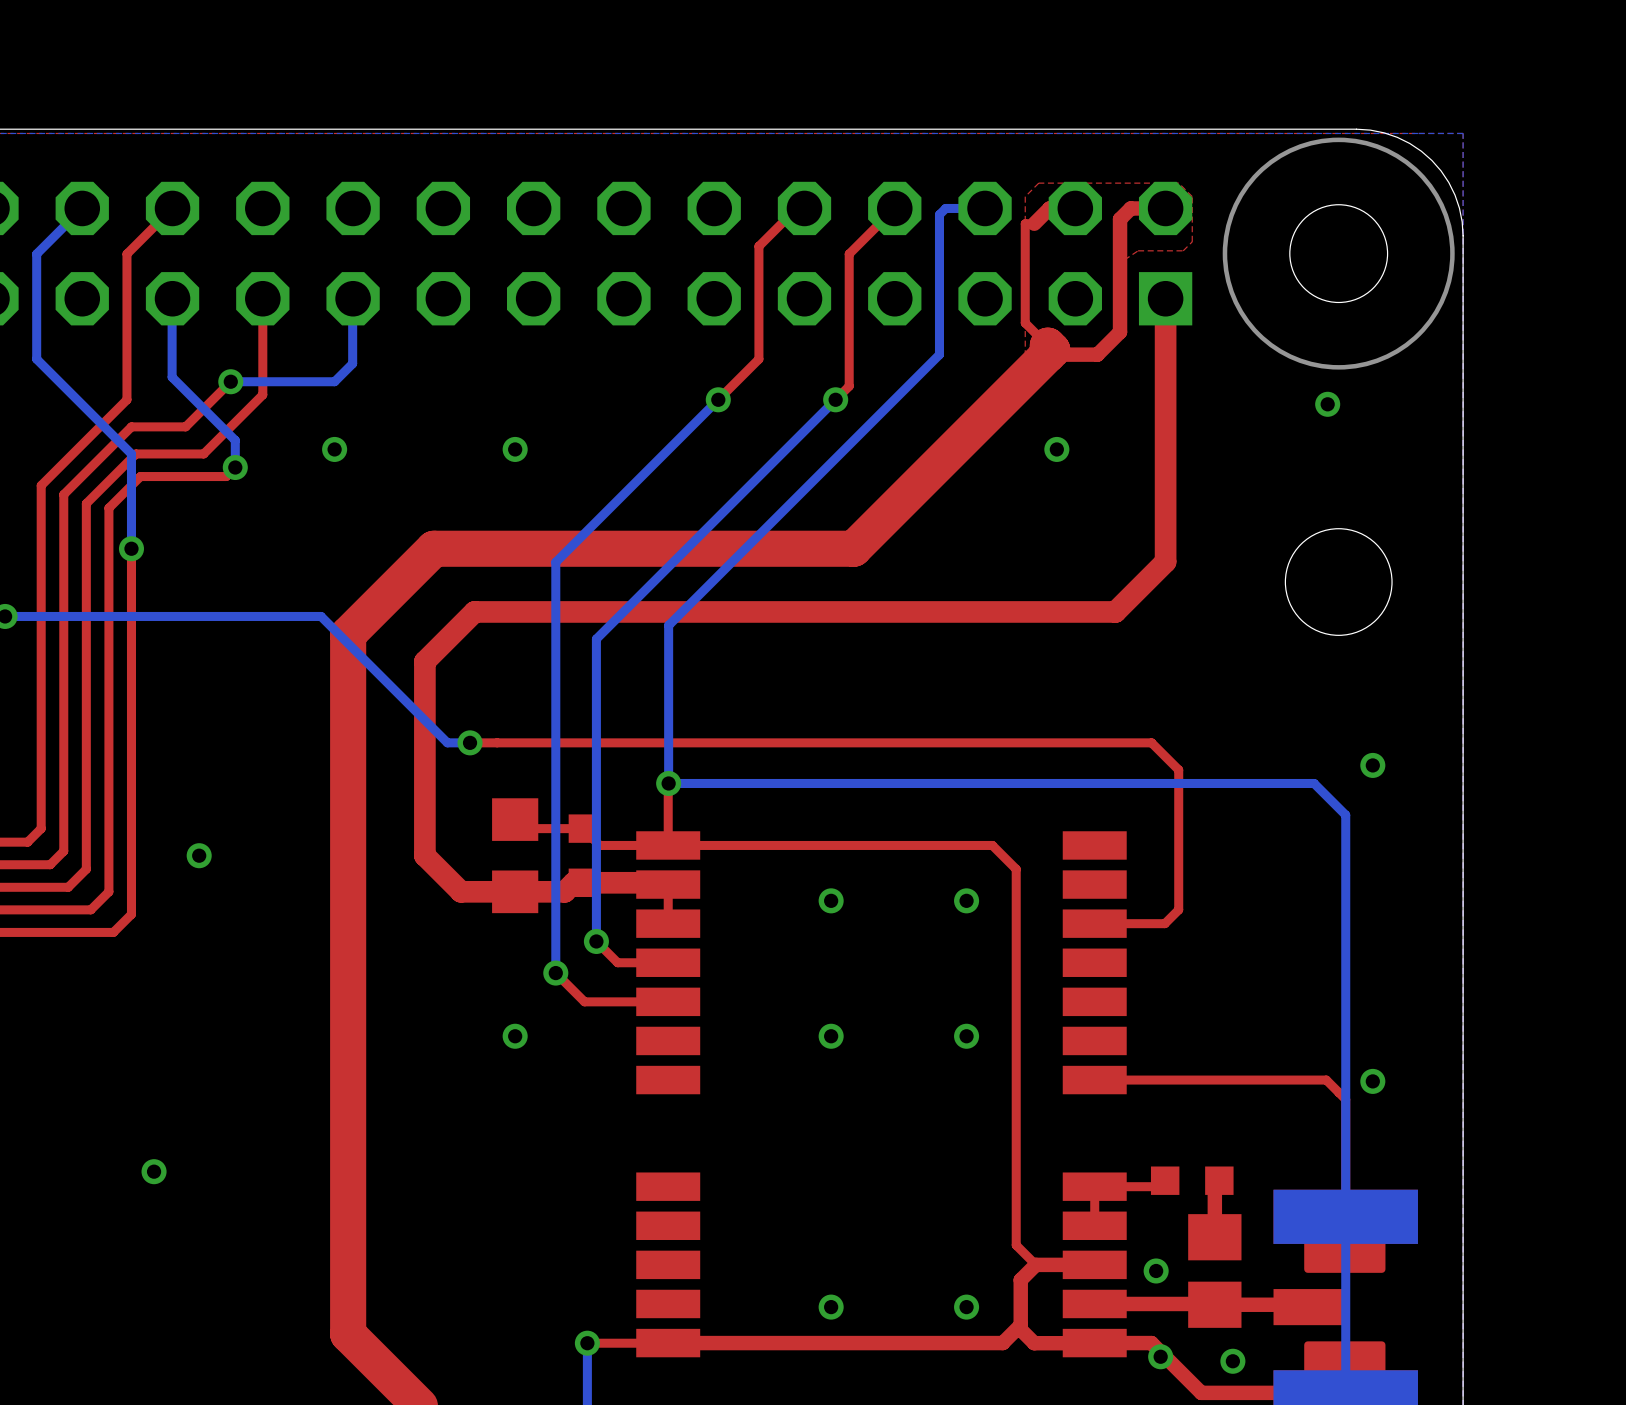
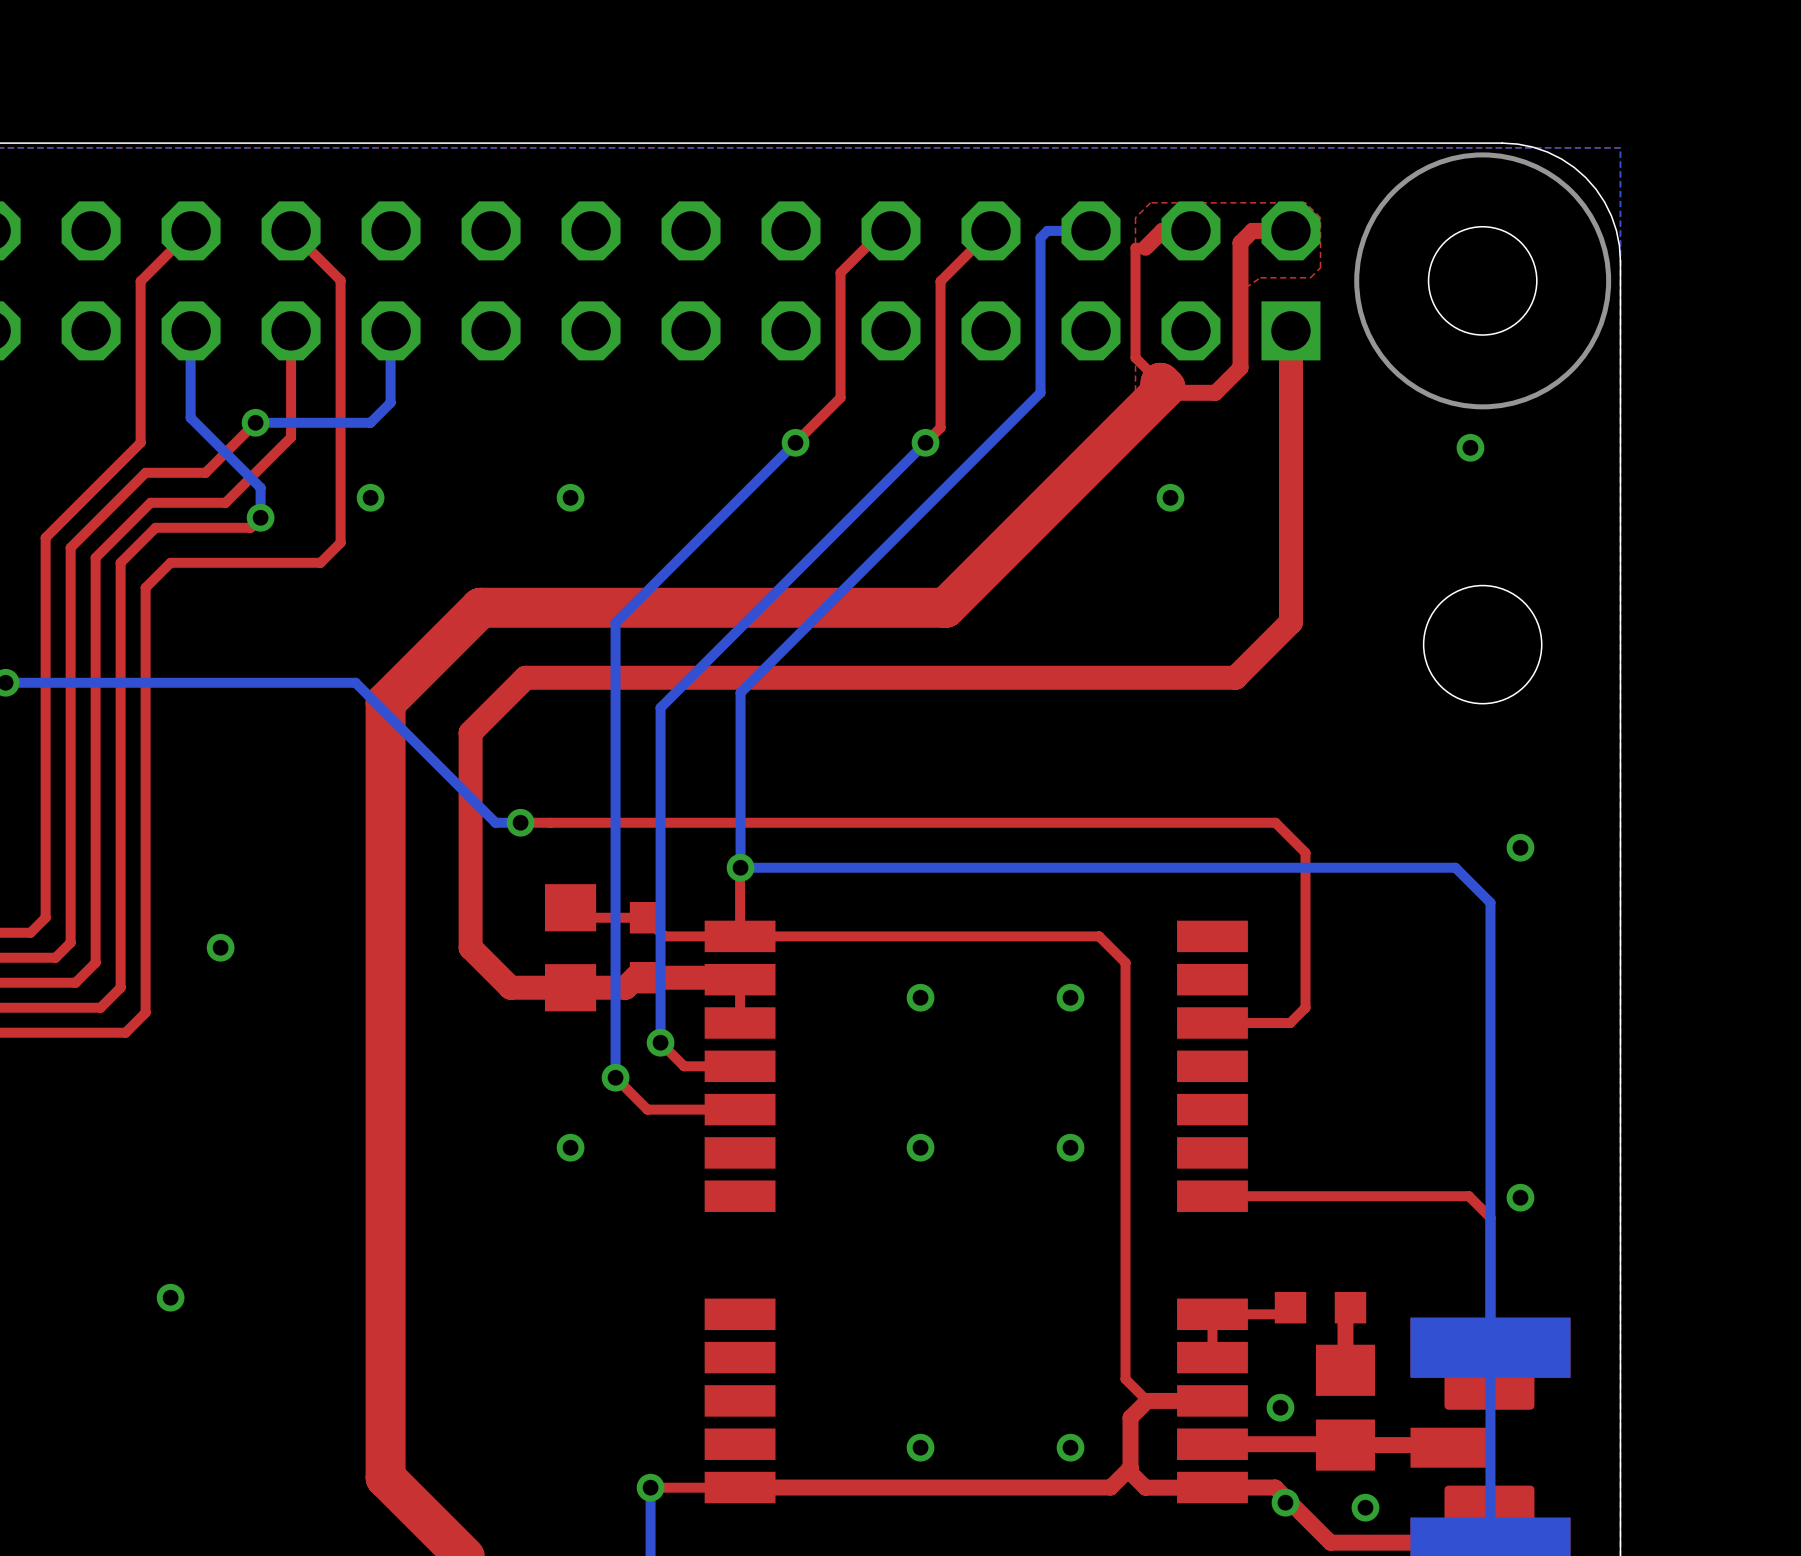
bottom track: (82, 208) (36, 254) (36, 359) (131, 453) (131, 548) -> none
top track: none -> (291, 230) (340, 280) (340, 542) (320, 562) (170, 562) (145, 587) (145, 607)
via: (131, 548) -> none

